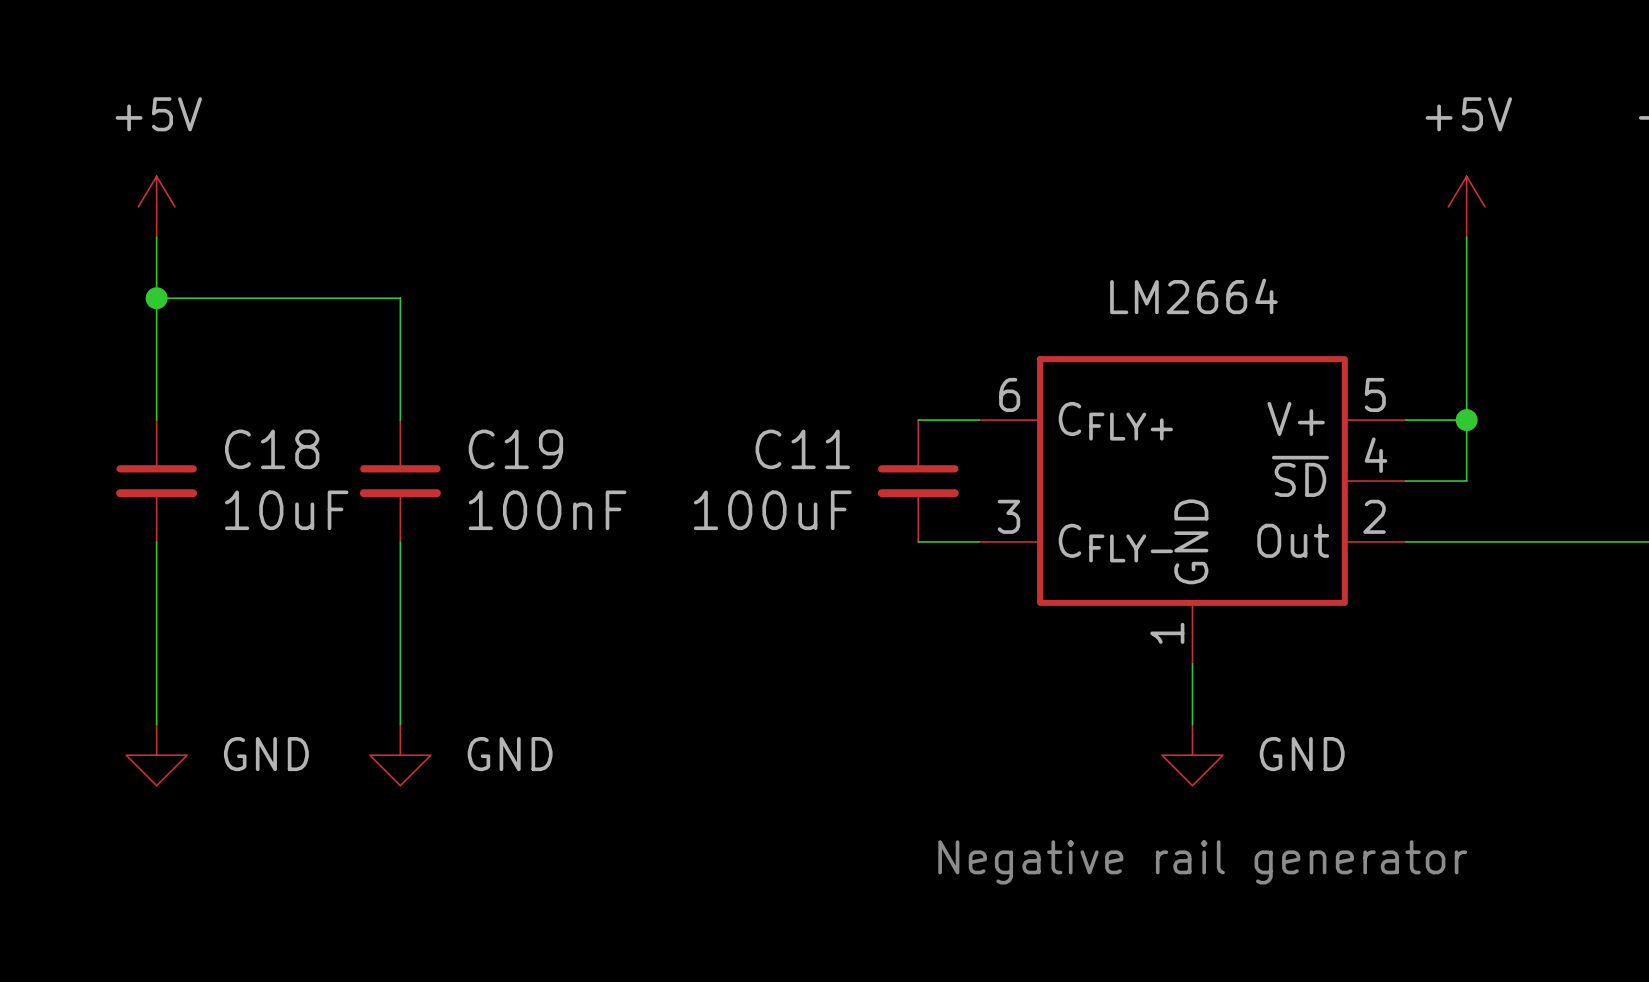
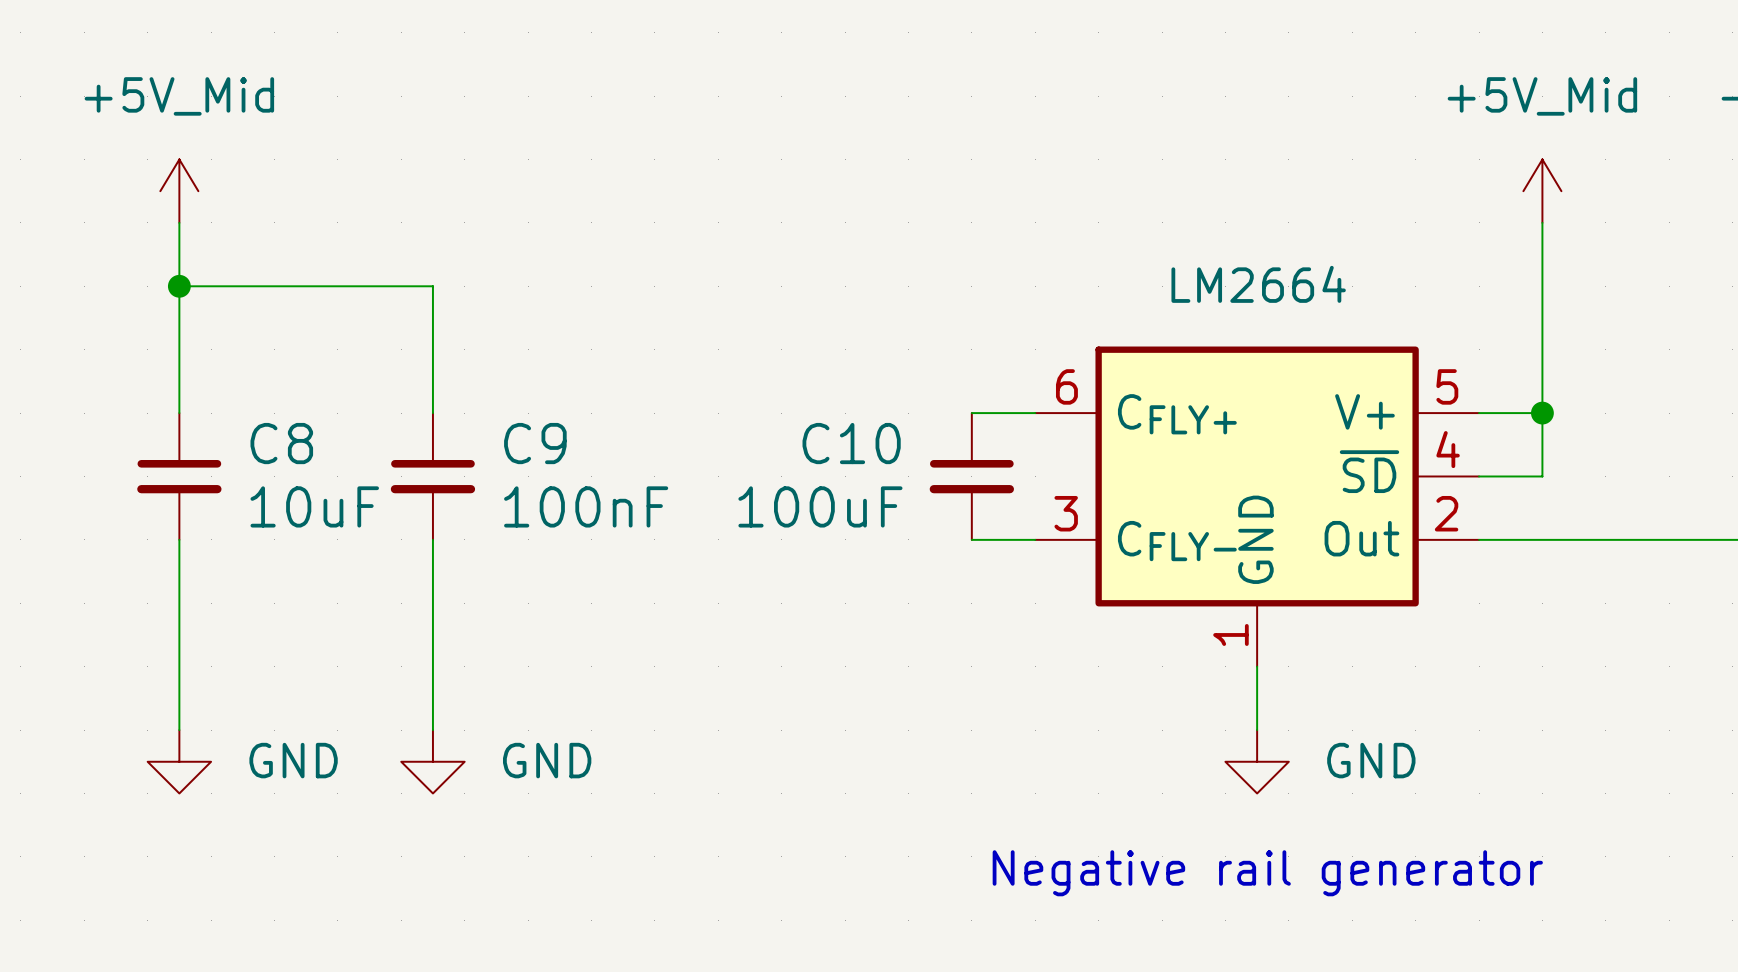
power symbol: +5V (156, 206) -> +5V_Mid (179, 191)
power symbol: +5V (1466, 206) -> +5V_Mid (1542, 191)
C18 name: C18 (272, 449) -> C8 (281, 443)
C19 name: C19 (515, 449) -> C9 (535, 443)
C11 name: C11 (802, 449) -> C10 (851, 443)

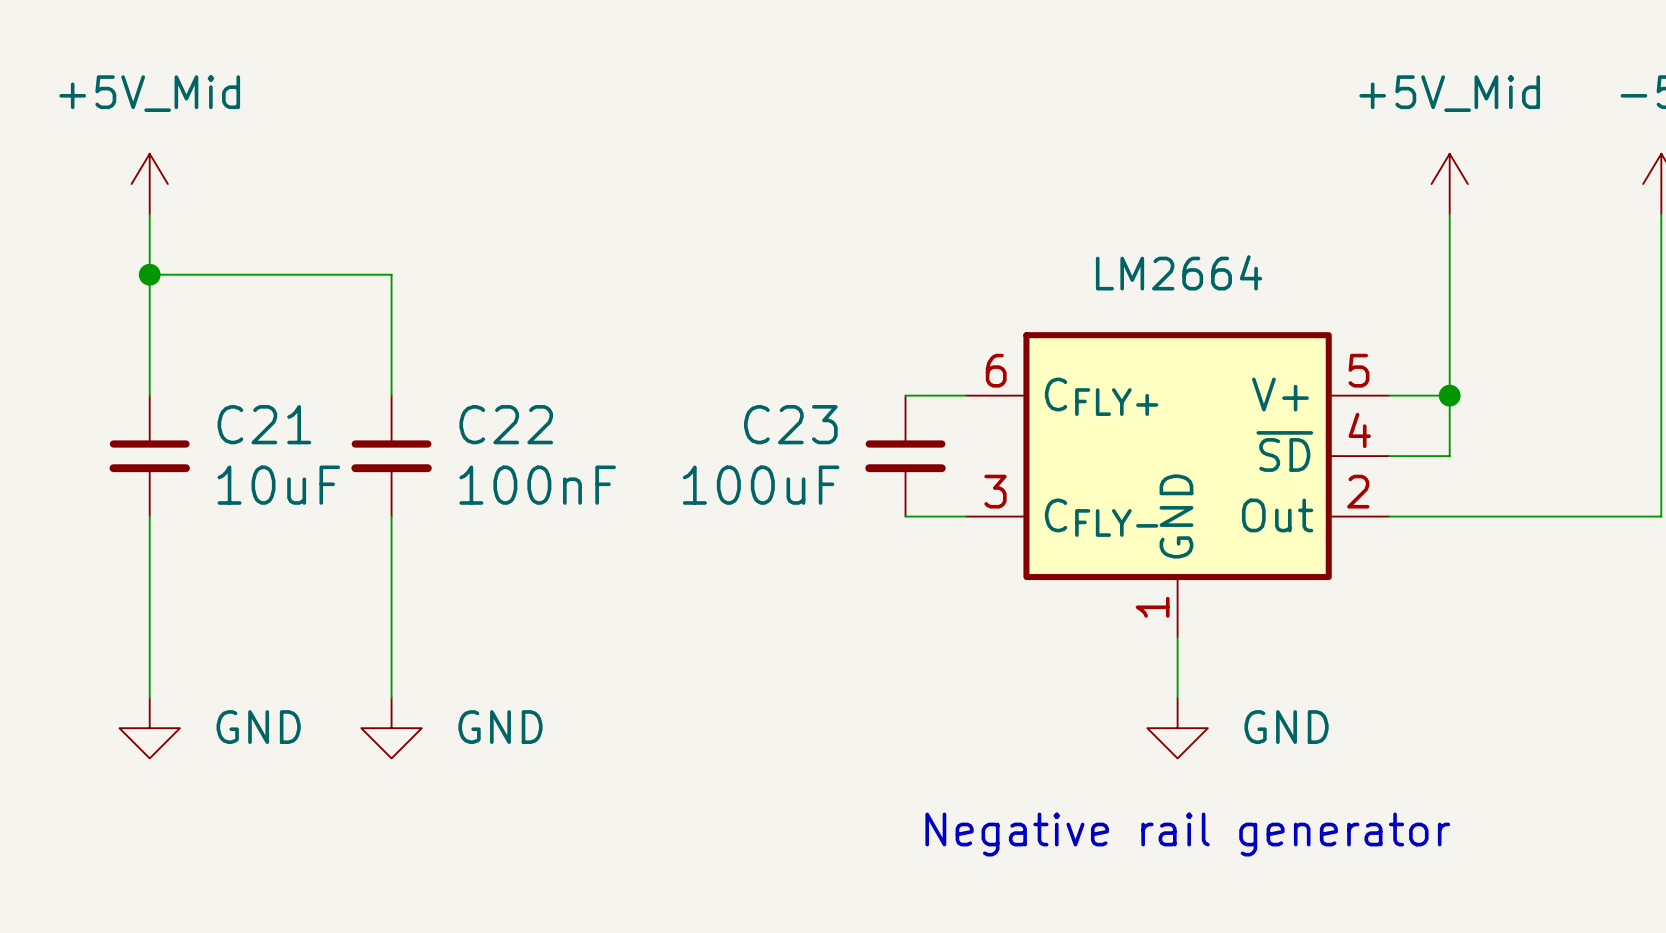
C8 name: C8 (281, 443) -> C21 (264, 424)
C9 name: C9 (535, 443) -> C22 (506, 424)
C10 name: C10 (851, 443) -> C23 (790, 424)

